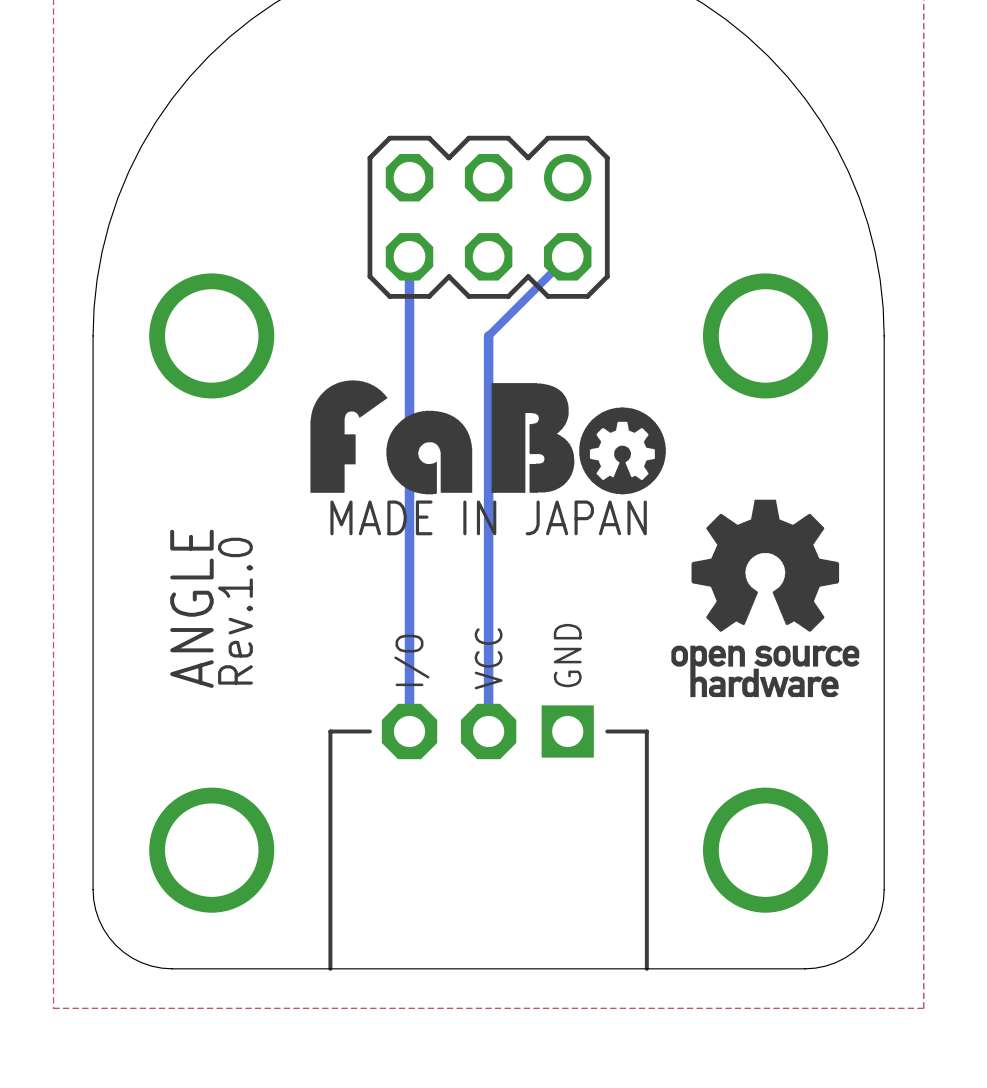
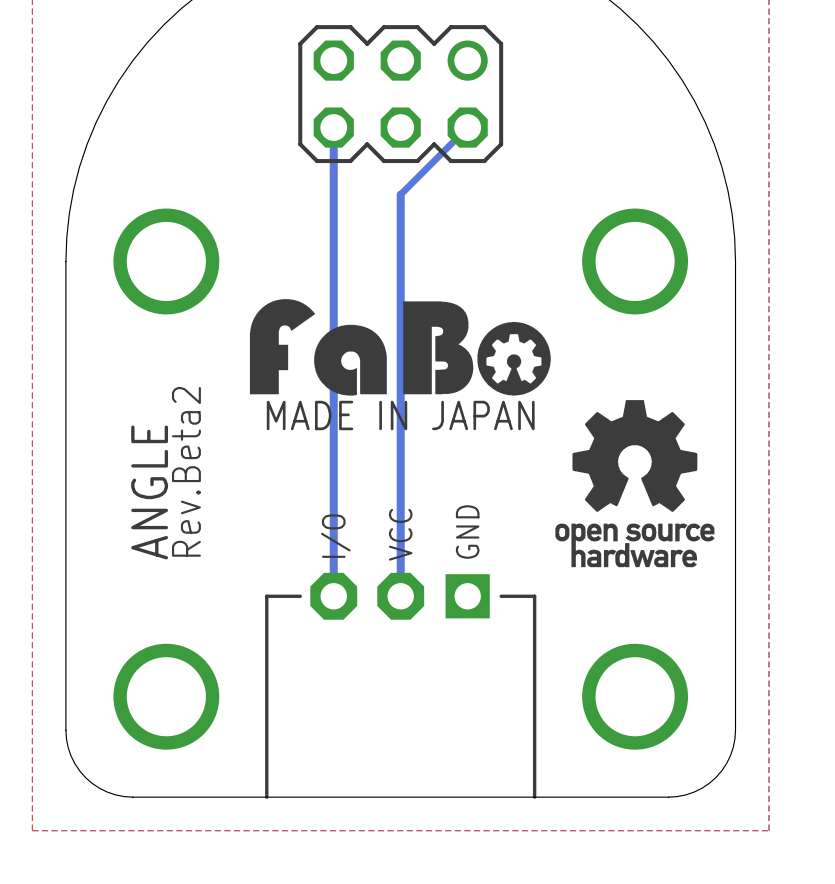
bottom track: none -> (333, 127) (333, 194)
part position: (488, 217) -> (400, 94)
bottom track: (567, 256) (488, 335) -> (467, 127) (400, 194) (400, 261)
text: Rev.1.0 (235, 611) -> Rev.Beta2 (186, 471)

